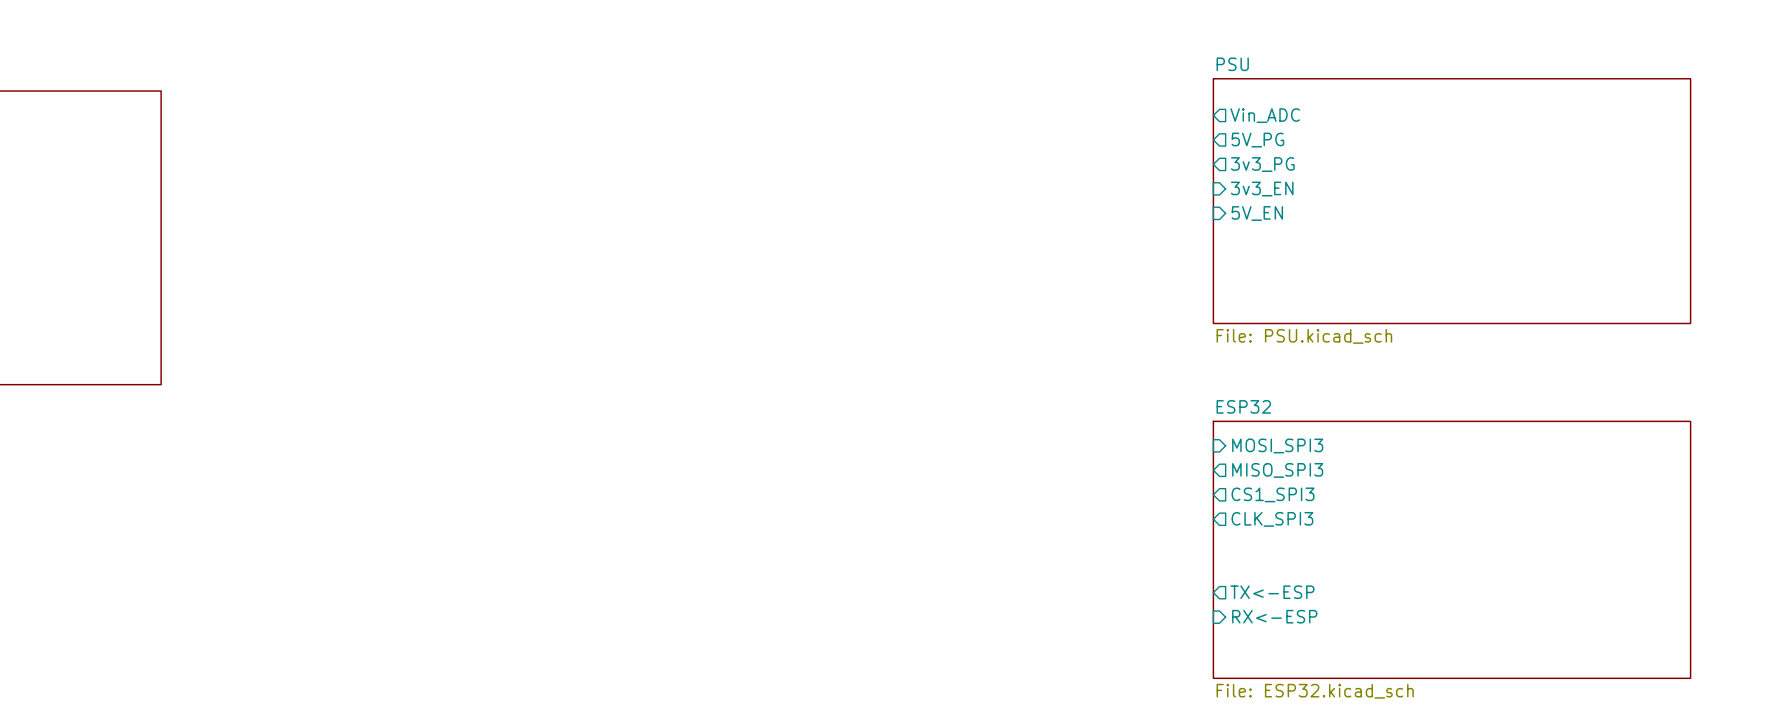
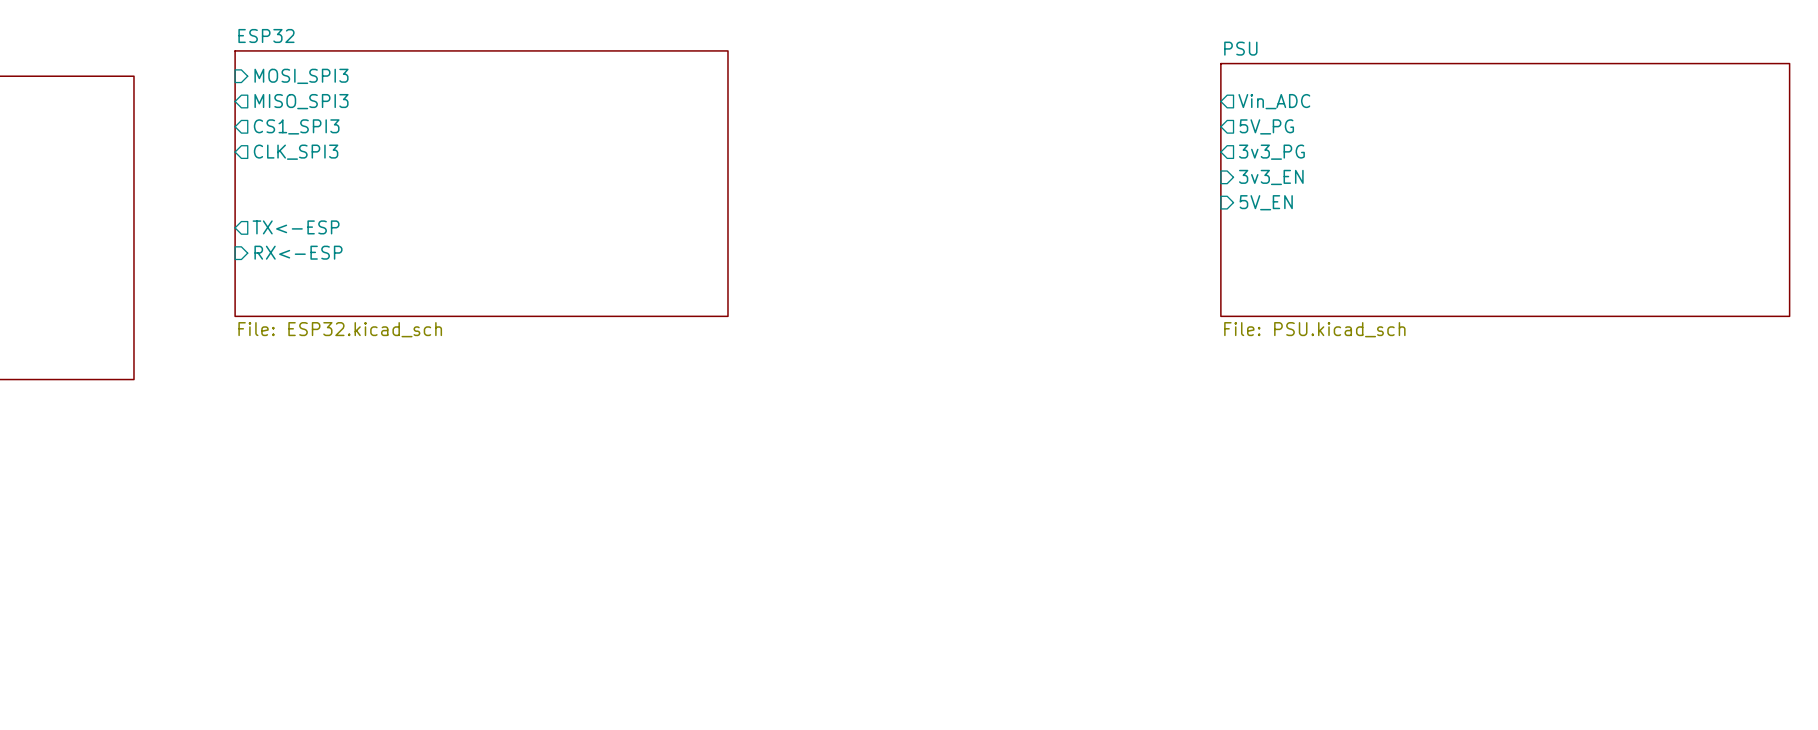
sheet pin: none -> MOSI_SPI3 (301, 76)
sheet pin: none -> MISO_SPI3 (301, 101)
sheet pin: none -> CS1_SPI3 (296, 126)
sheet pin: none -> CLK_SPI3 (296, 152)
sheet PSU: File: PSU.kicad_sch (1451, 201) -> none
sheet PSU: none -> File: PSU.kicad_sch (1505, 189)
sheet pin: none -> TX<-ESP (296, 227)
sheet pin: none -> RX<-ESP (298, 252)
sheet pin: MOSI_SPI3 (1277, 445) -> none
sheet pin: MISO_SPI3 (1277, 470) -> none
sheet pin: CS1_SPI3 (1273, 494) -> none
sheet pin: CLK_SPI3 (1272, 519) -> none
sheet ESP32 position: (1451, 549) -> (481, 183)
sheet pin: TX<-ESP (1272, 592) -> none
sheet pin: RX<-ESP (1274, 616) -> none

